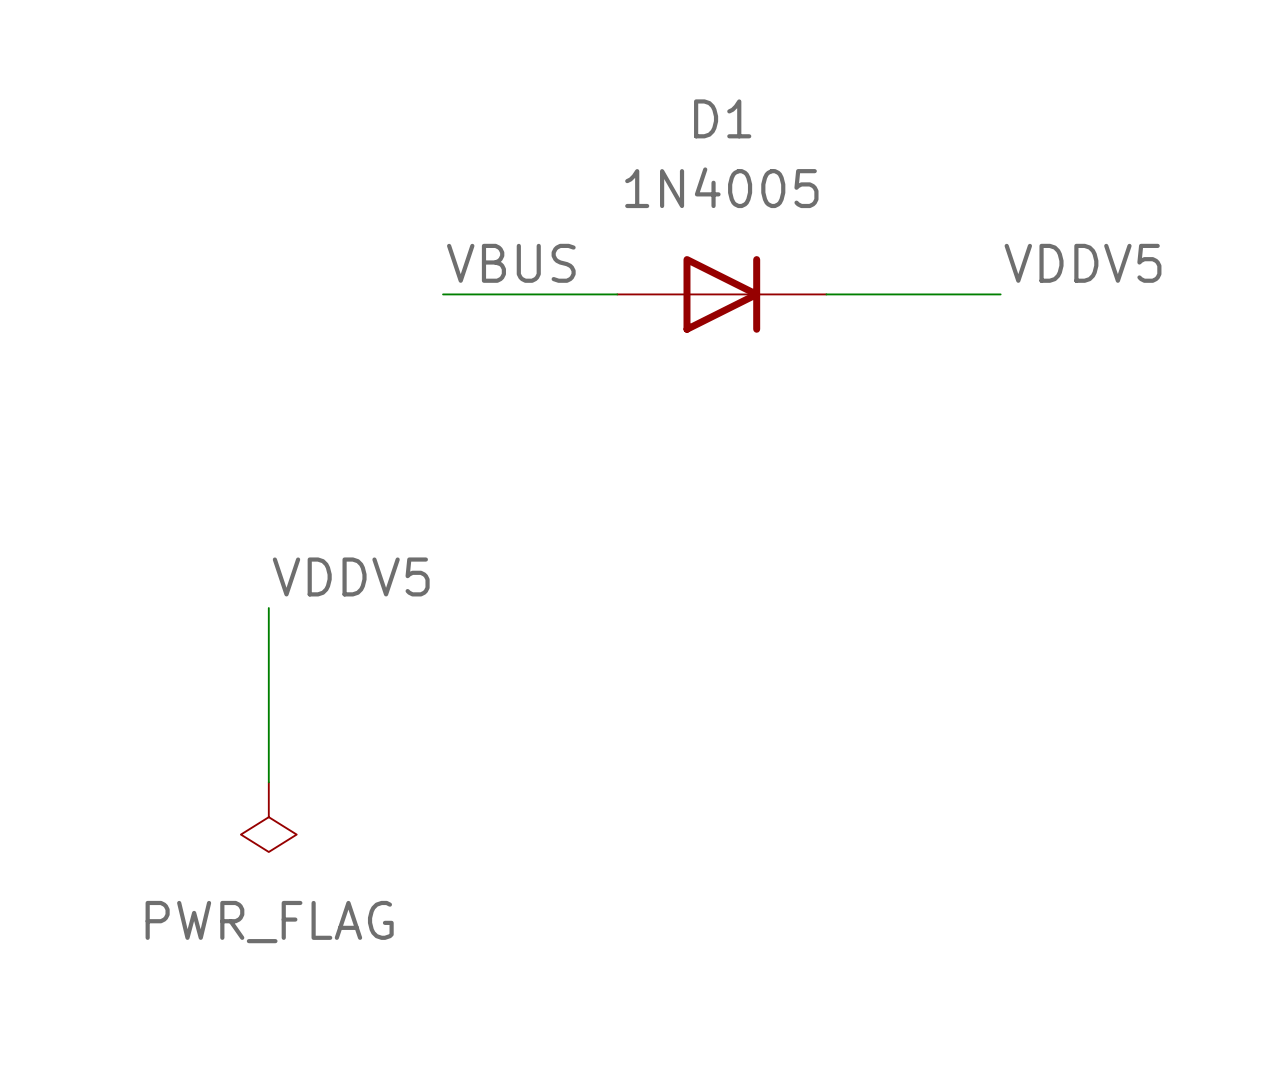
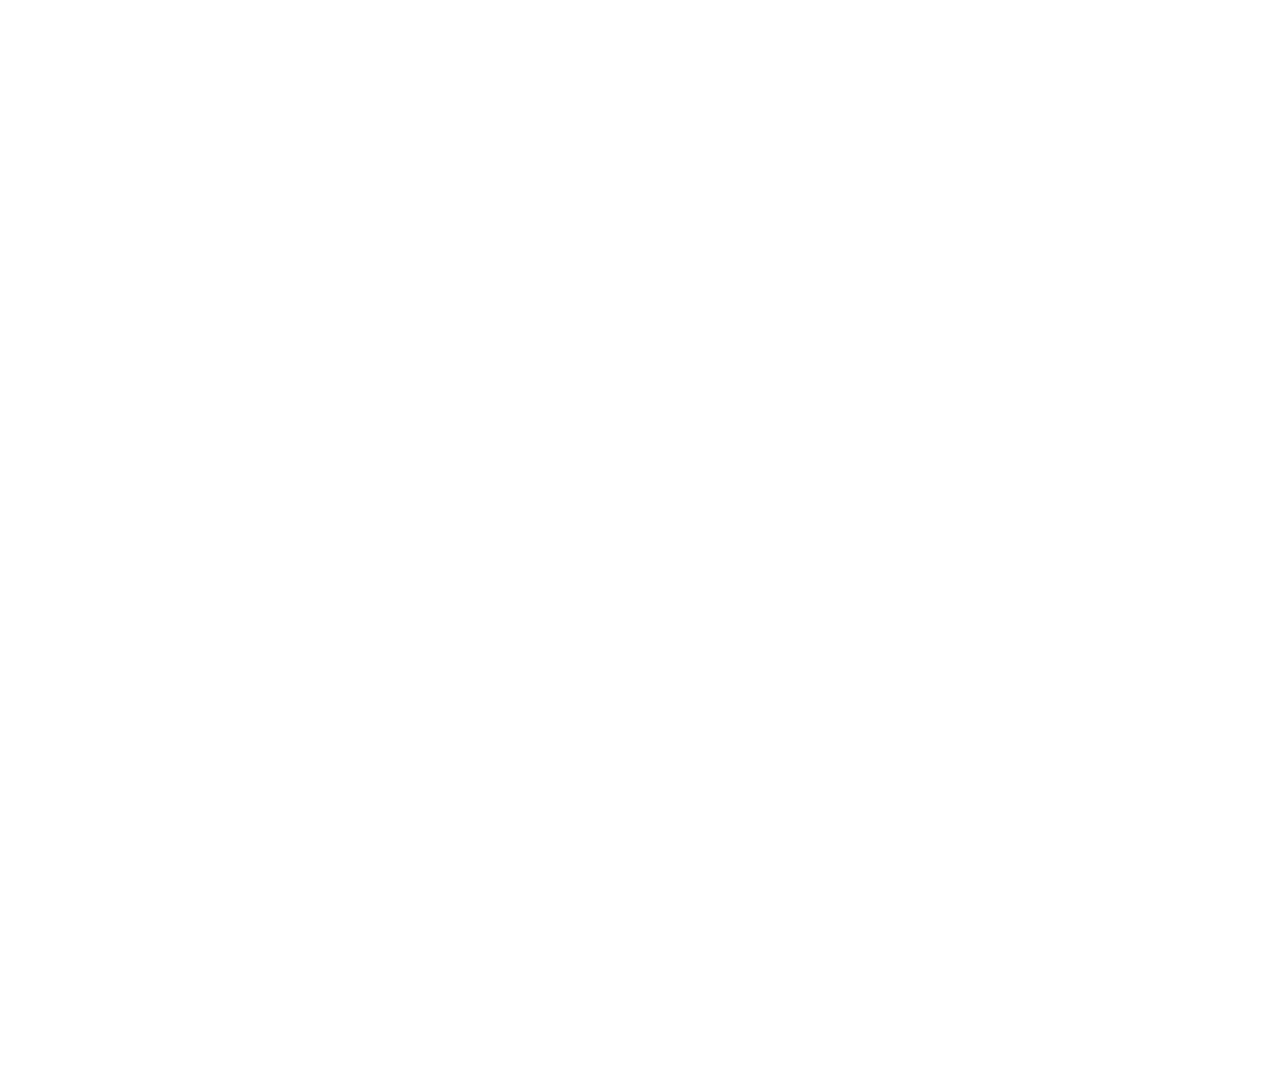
label: VBUS (511, 263) -> none
label: VDDV5 (1083, 263) -> none
wire: (443, 294) (617, 294) -> none
D1: 1N4005 (721, 294) -> none
wire: (826, 294) (1000, 294) -> none
label: VDDV5 (351, 576) -> none
wire: (268, 608) (268, 782) -> none
power symbol: PWR_FLAG (268, 817) -> none

